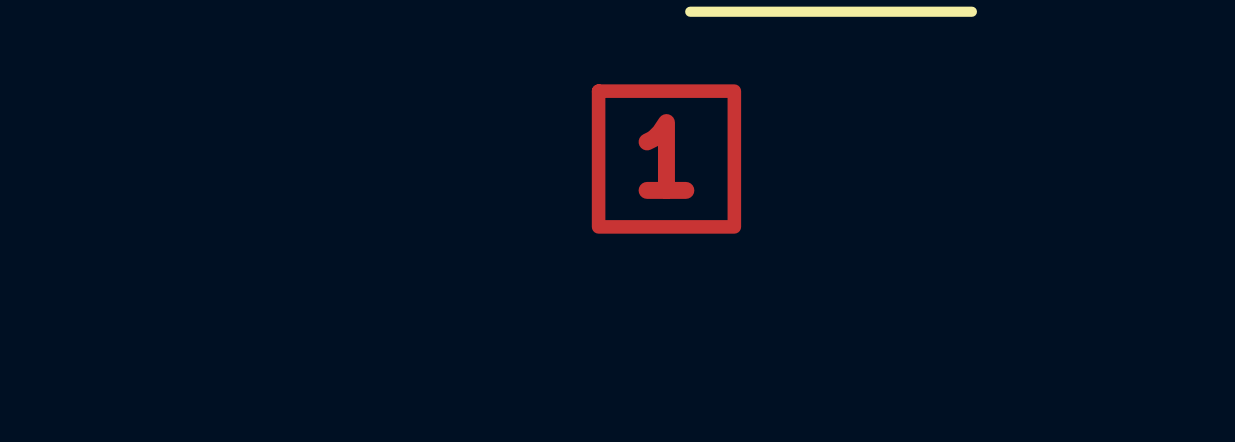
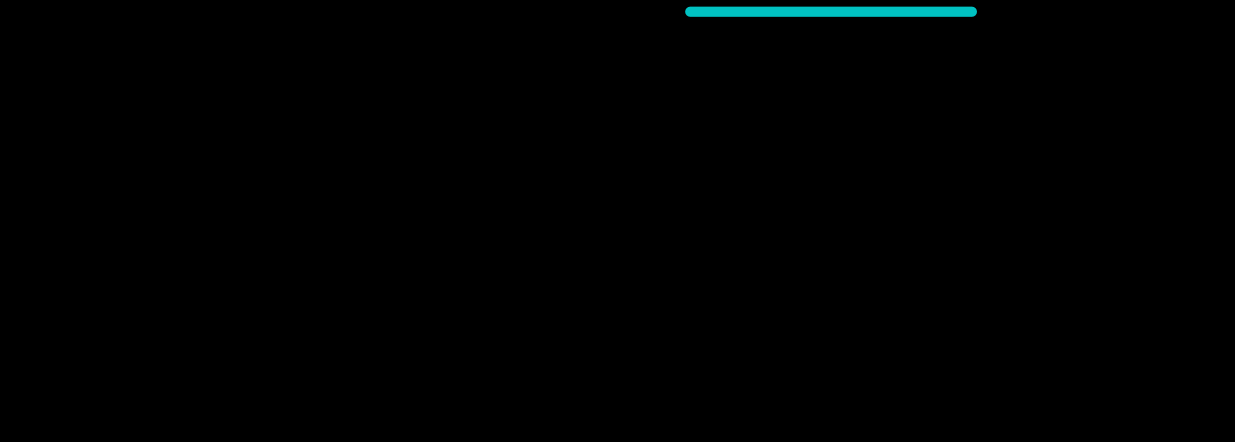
drawing: [591, 84, 742, 234] -> none

